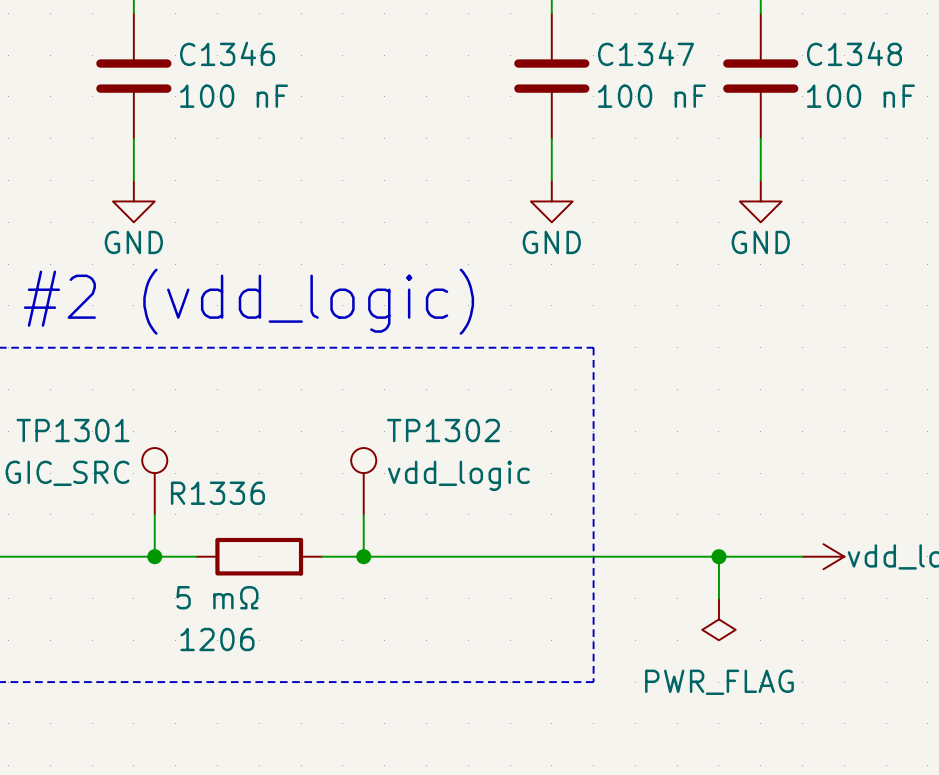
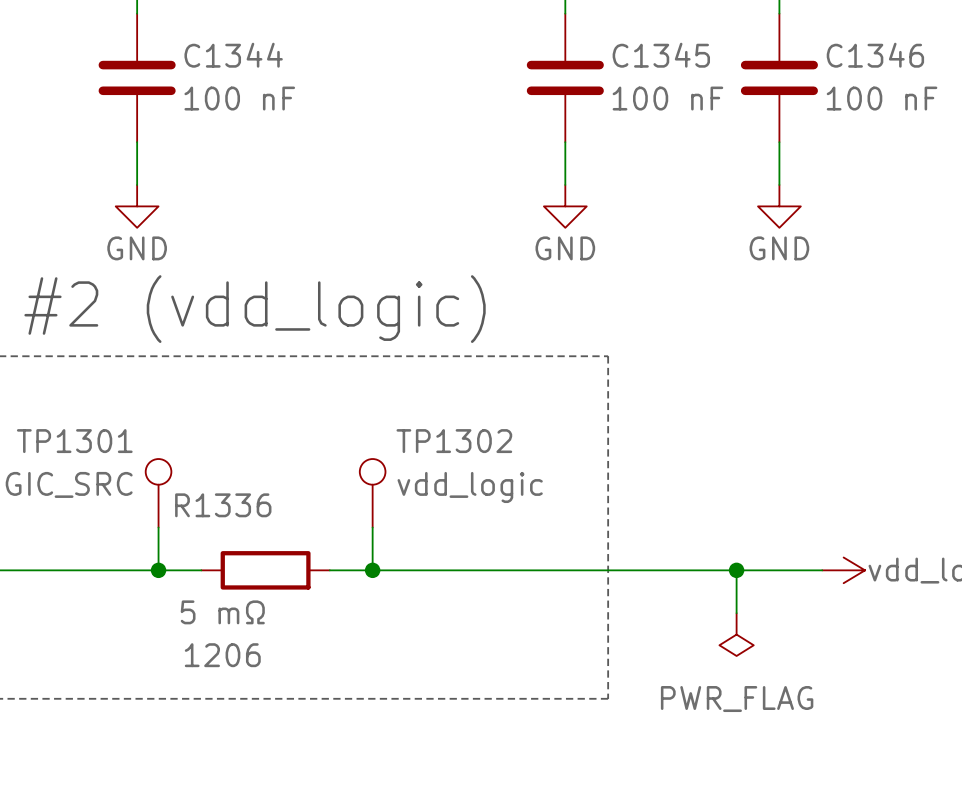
C1346 name: C1346 (227, 53) -> C1344 (233, 55)
C1347 name: C1347 (645, 53) -> C1345 (661, 55)
C1348 name: C1348 (854, 53) -> C1346 (875, 55)

